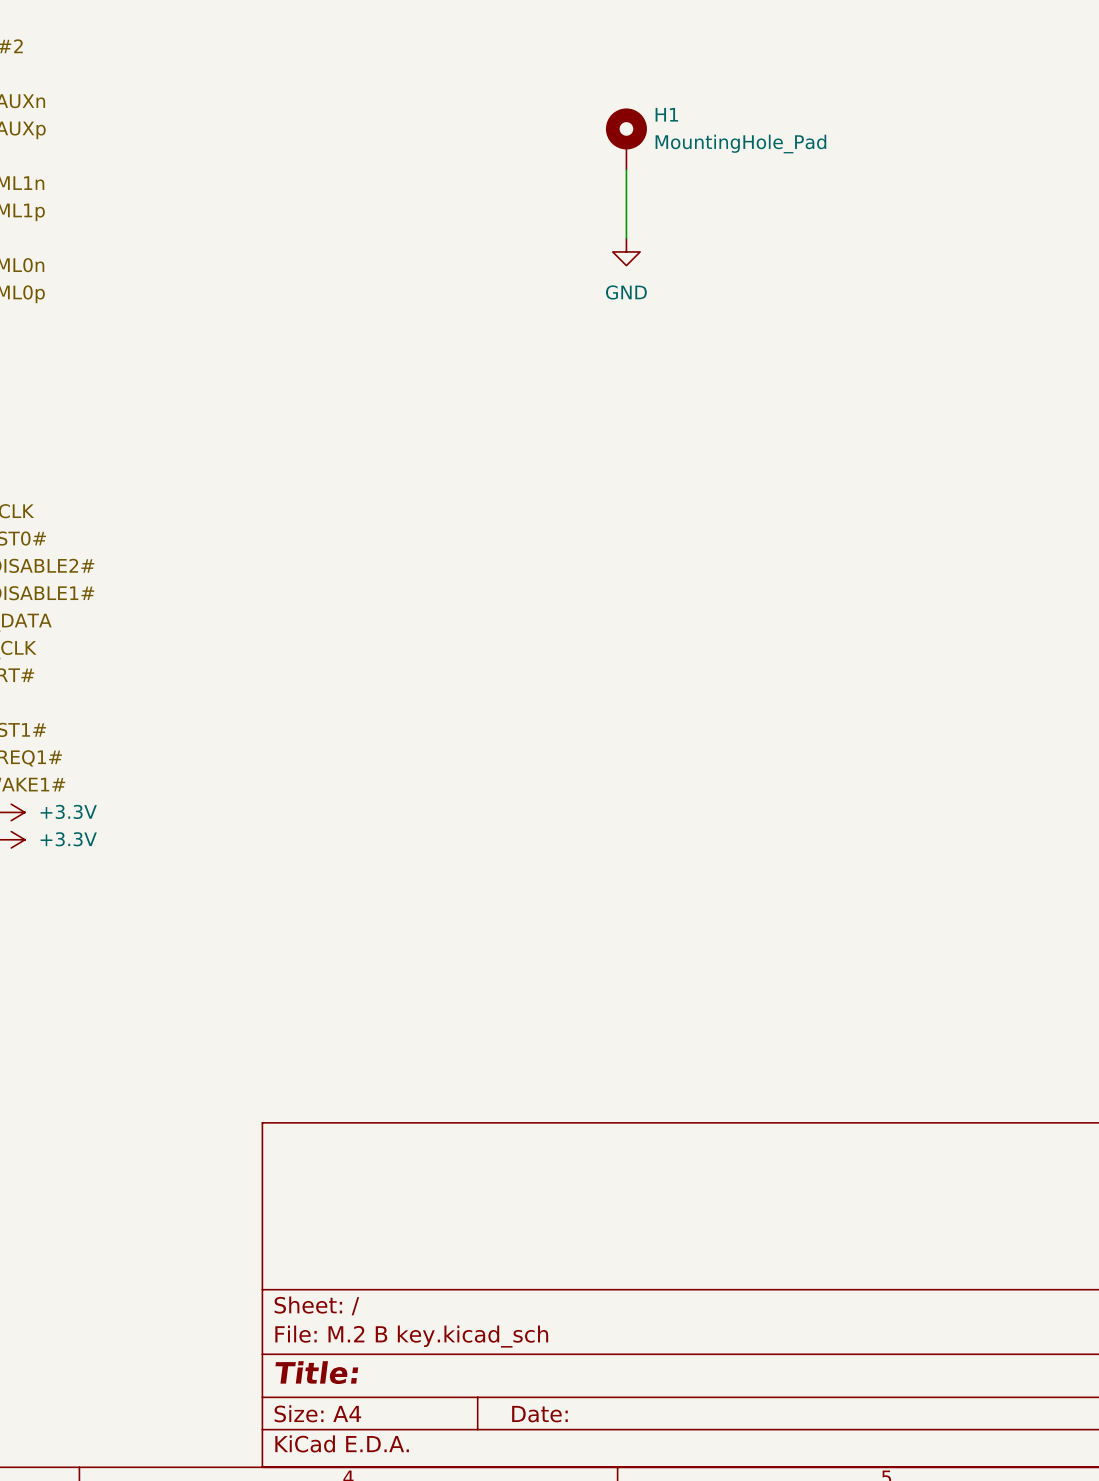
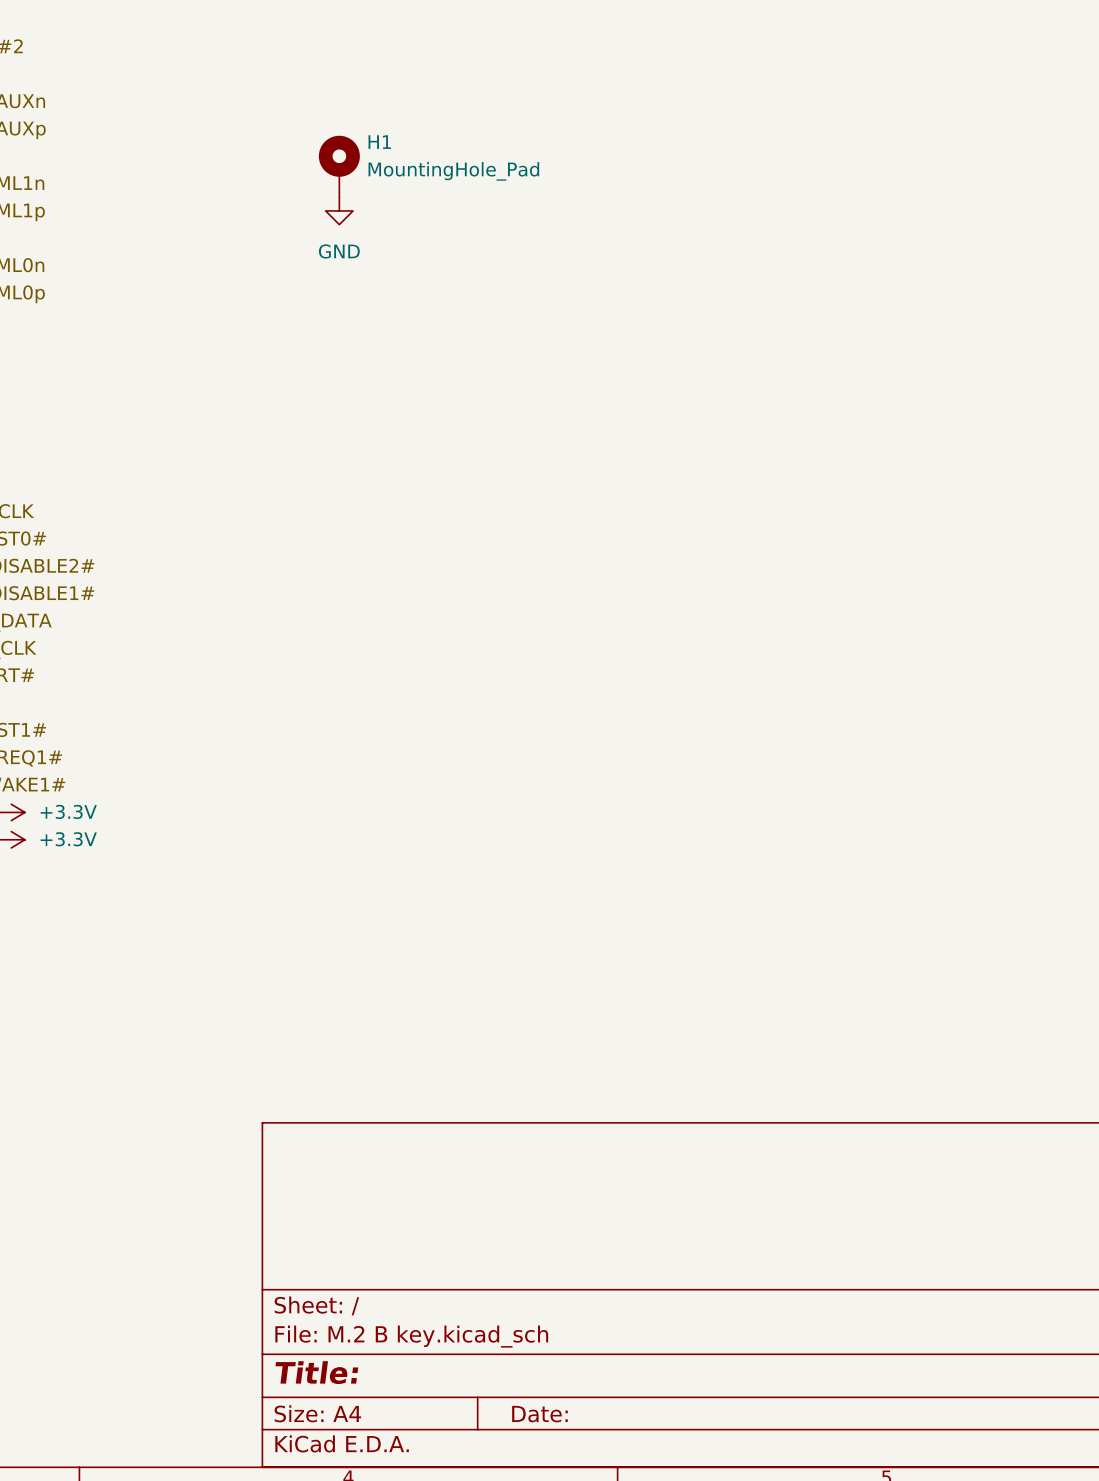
H1 position: (626, 139) -> (339, 166)
wire: (626, 169) (626, 238) -> none
power symbol: none -> GND (339, 210)
power symbol: GND (626, 251) -> none

